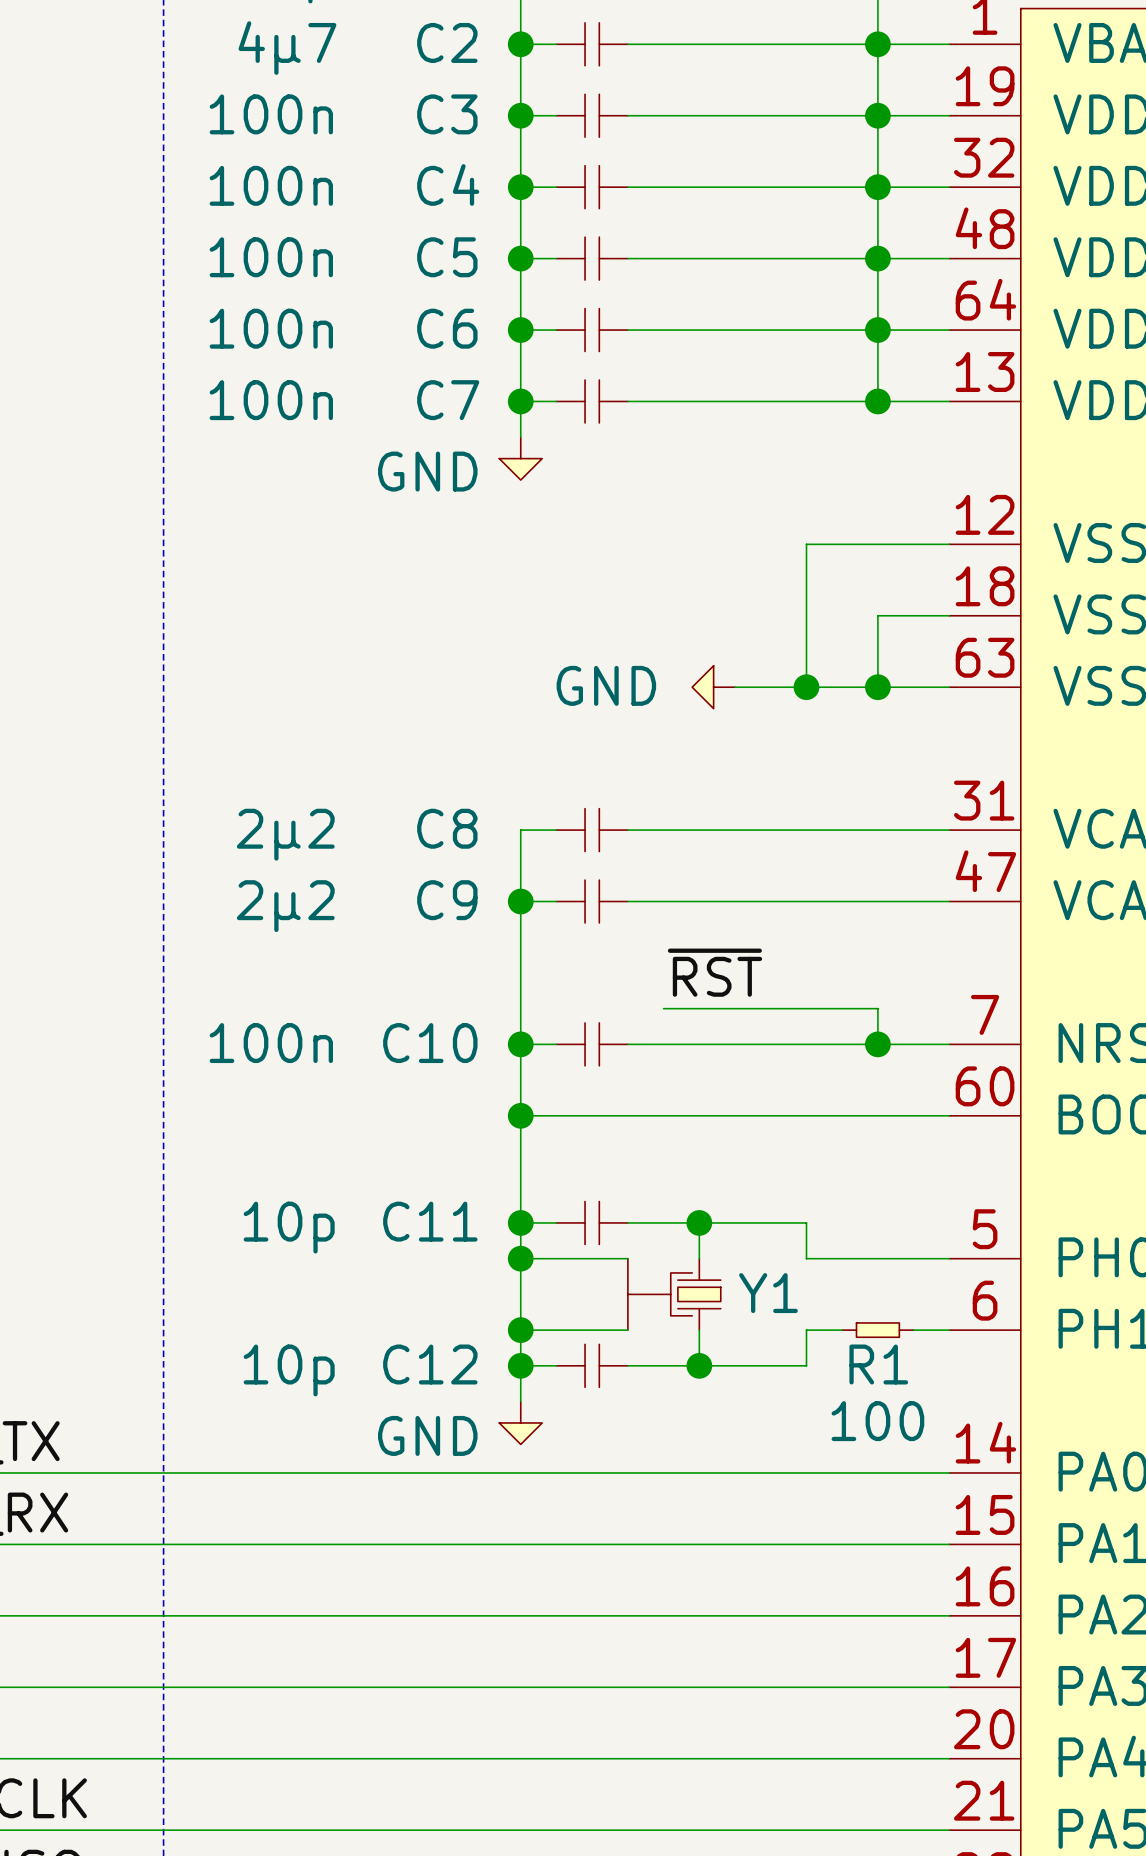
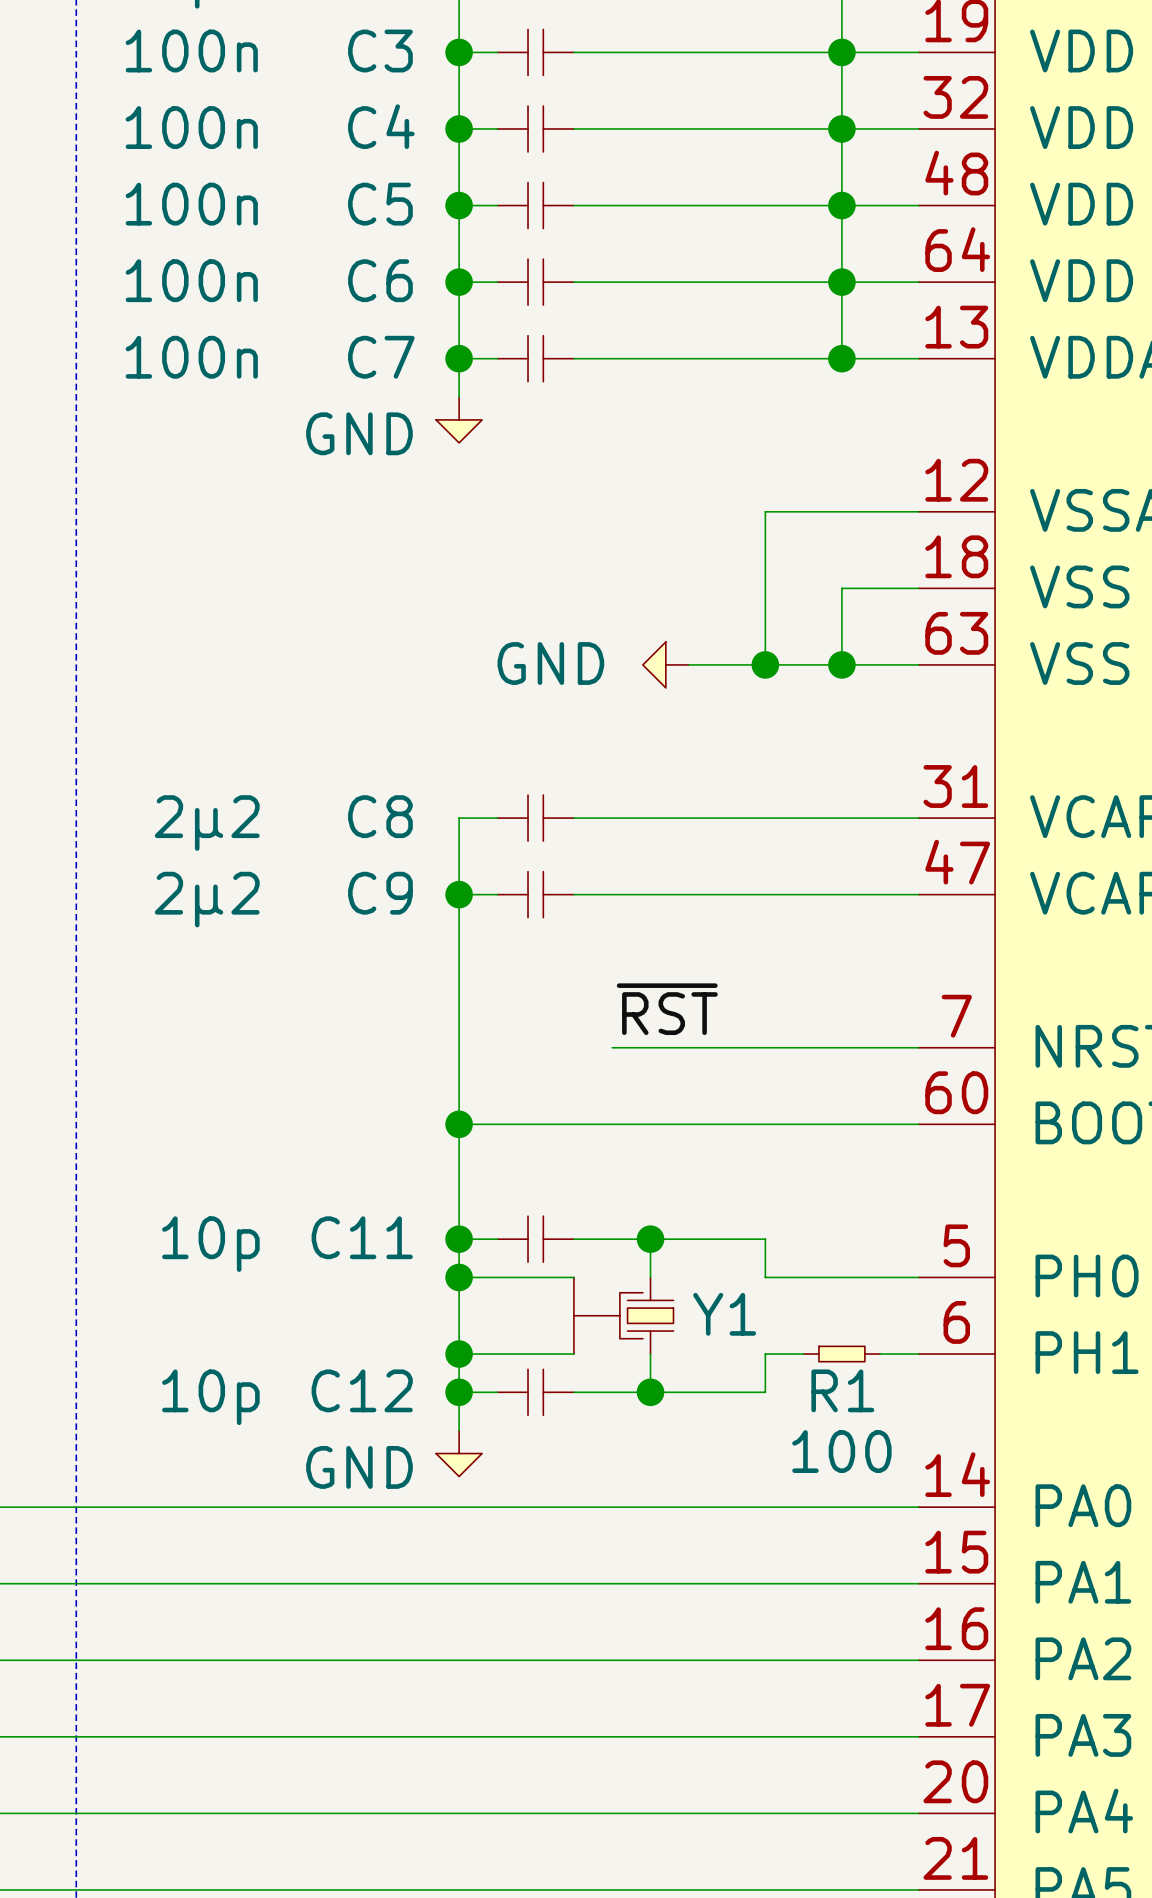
label position: ~{RST} (714, 972) -> ~{RST} (667, 1009)
wire: (663, 1008) (877, 1008) (877, 1044) -> none
wire: (520, 1044) (556, 1044) -> none
junction: (520, 1044) -> none
C10: 100n (592, 1044) -> none
wire: (627, 1044) (663, 1044) -> none
junction: (877, 1044) -> none

